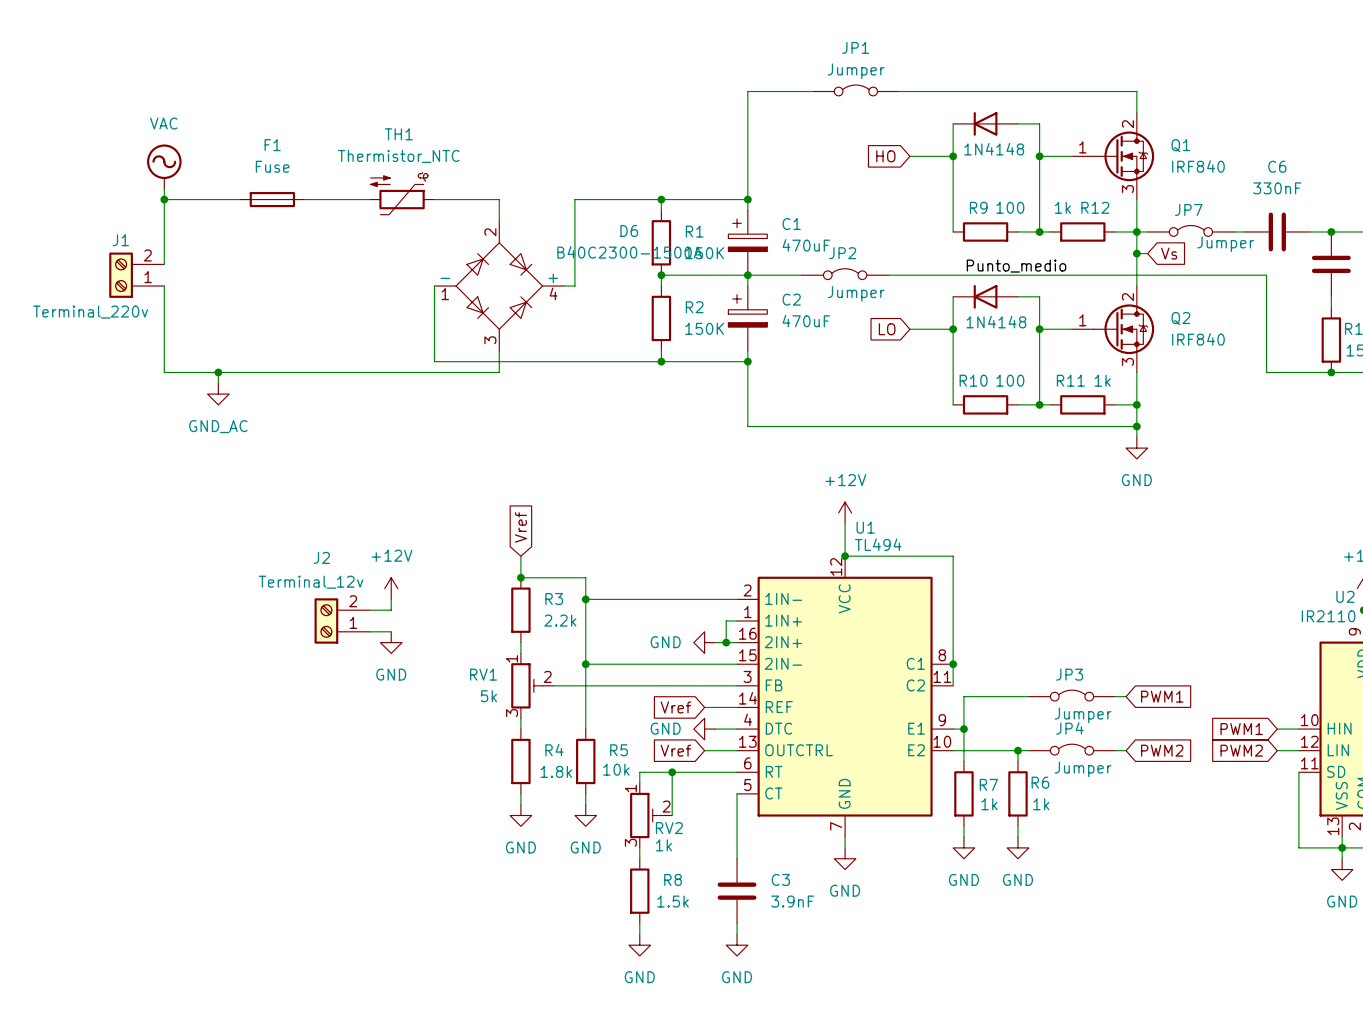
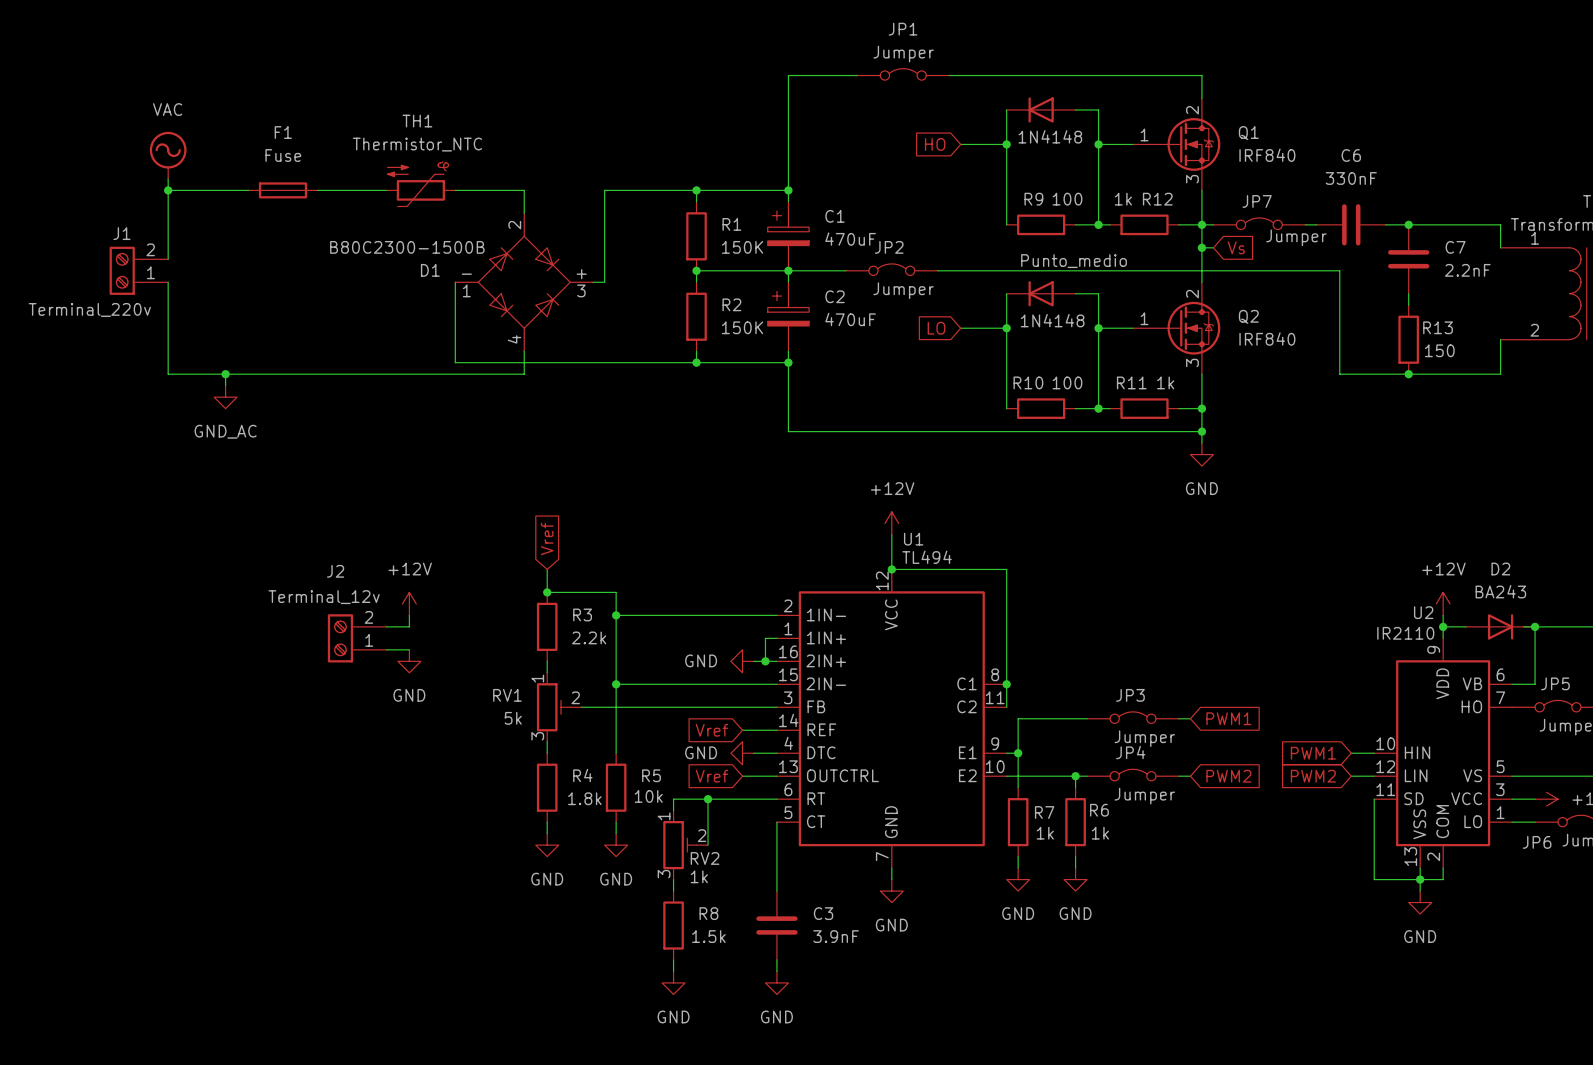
D6 name: D6 (629, 230) -> D1 (430, 270)
D6 value: B40C2300-1500A (629, 252) -> B80C2300-1500B (407, 247)
D6 pin number: 4 (553, 293) -> 3 (581, 290)
D6 pin number: 3 (490, 340) -> 4 (514, 339)

